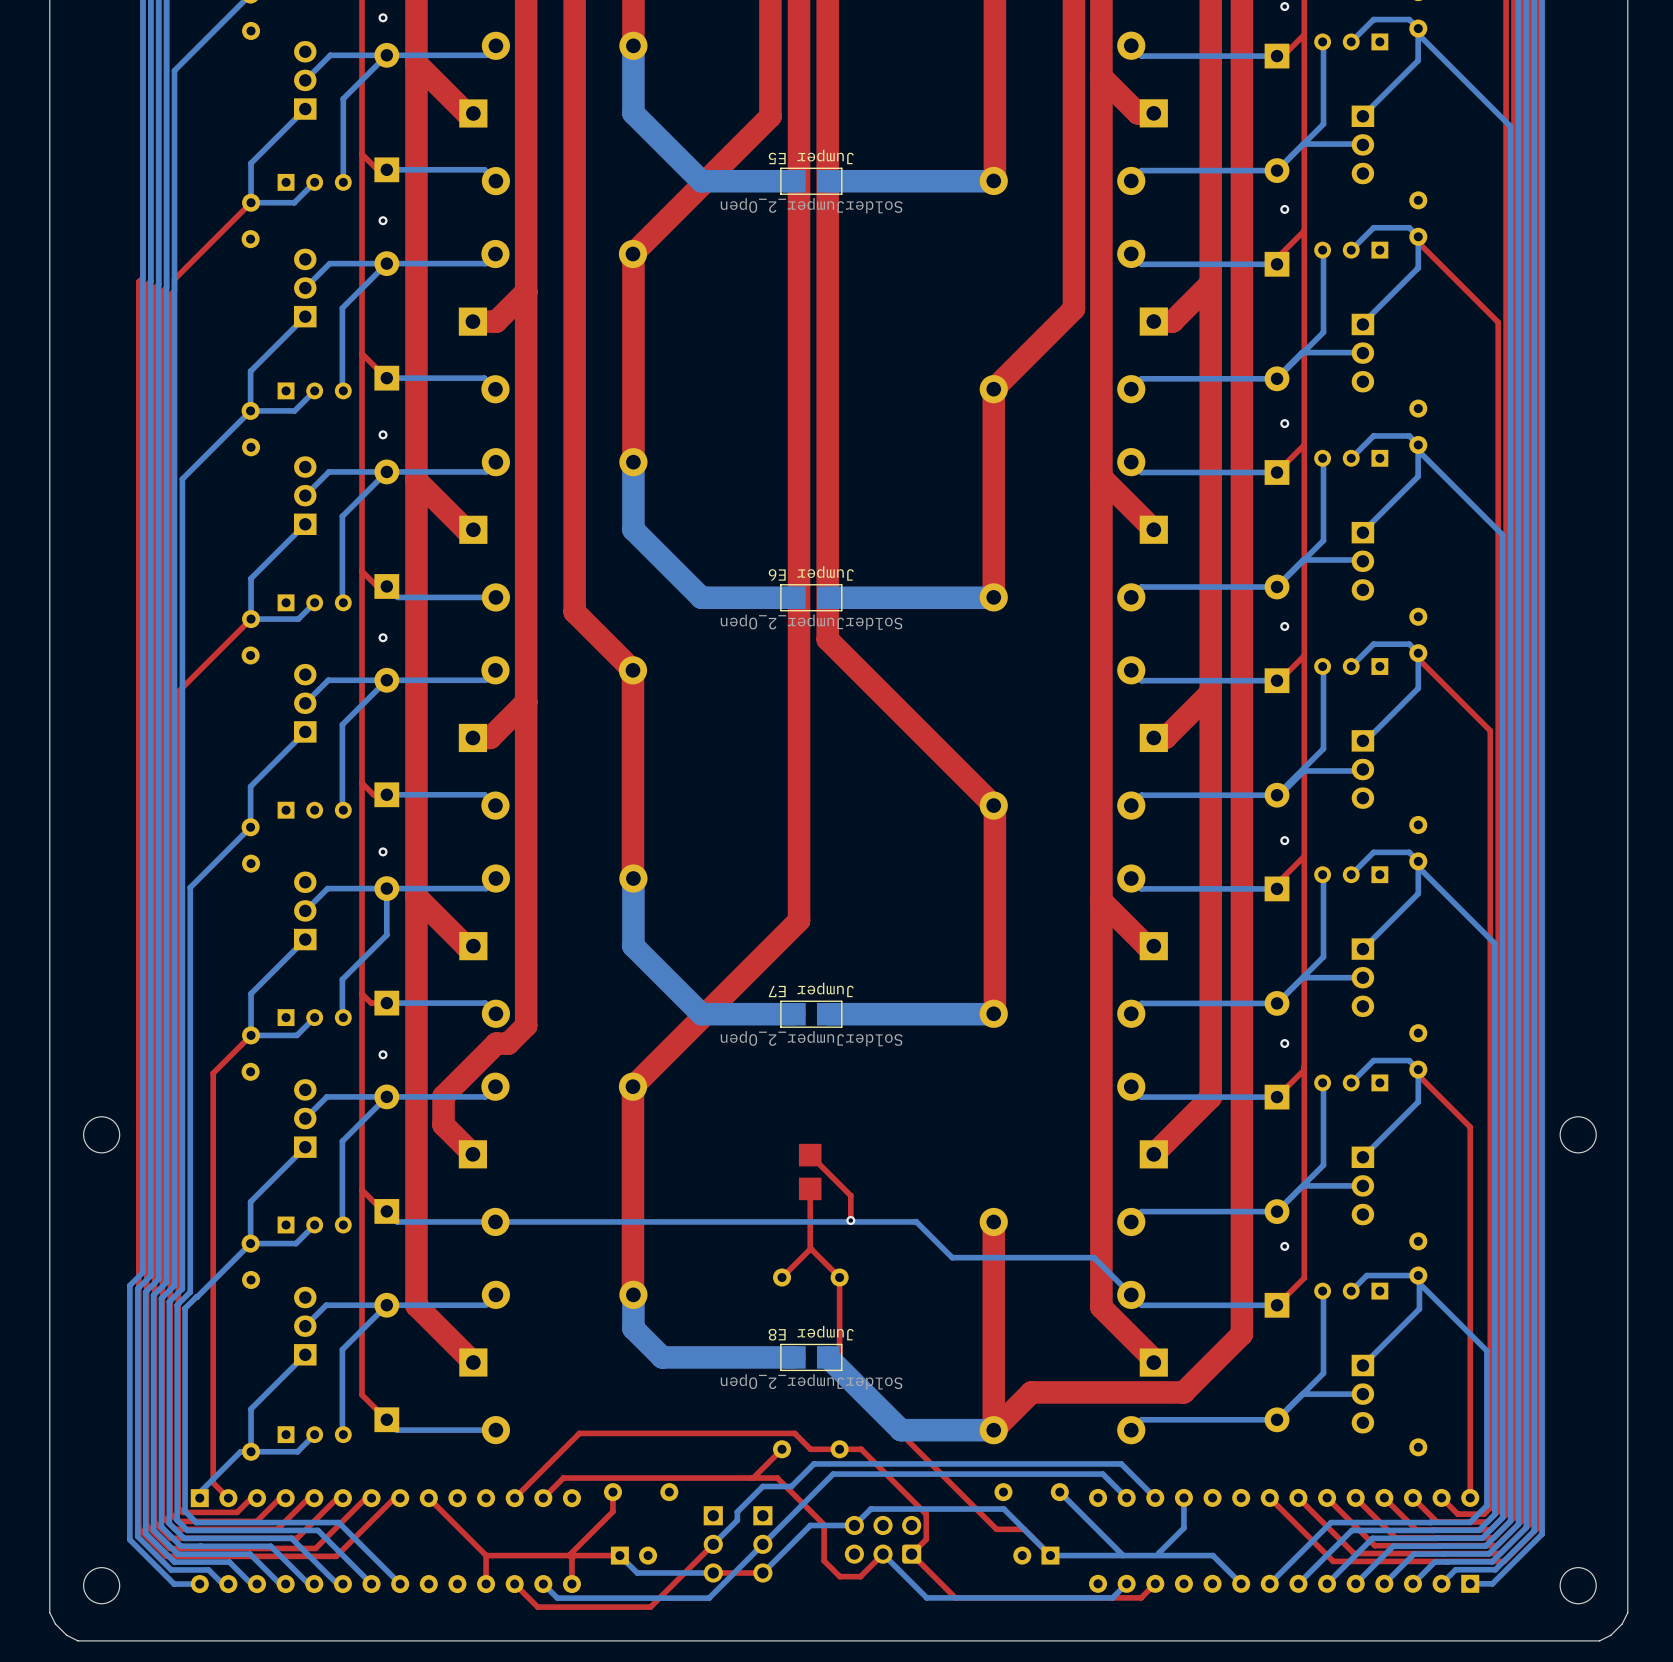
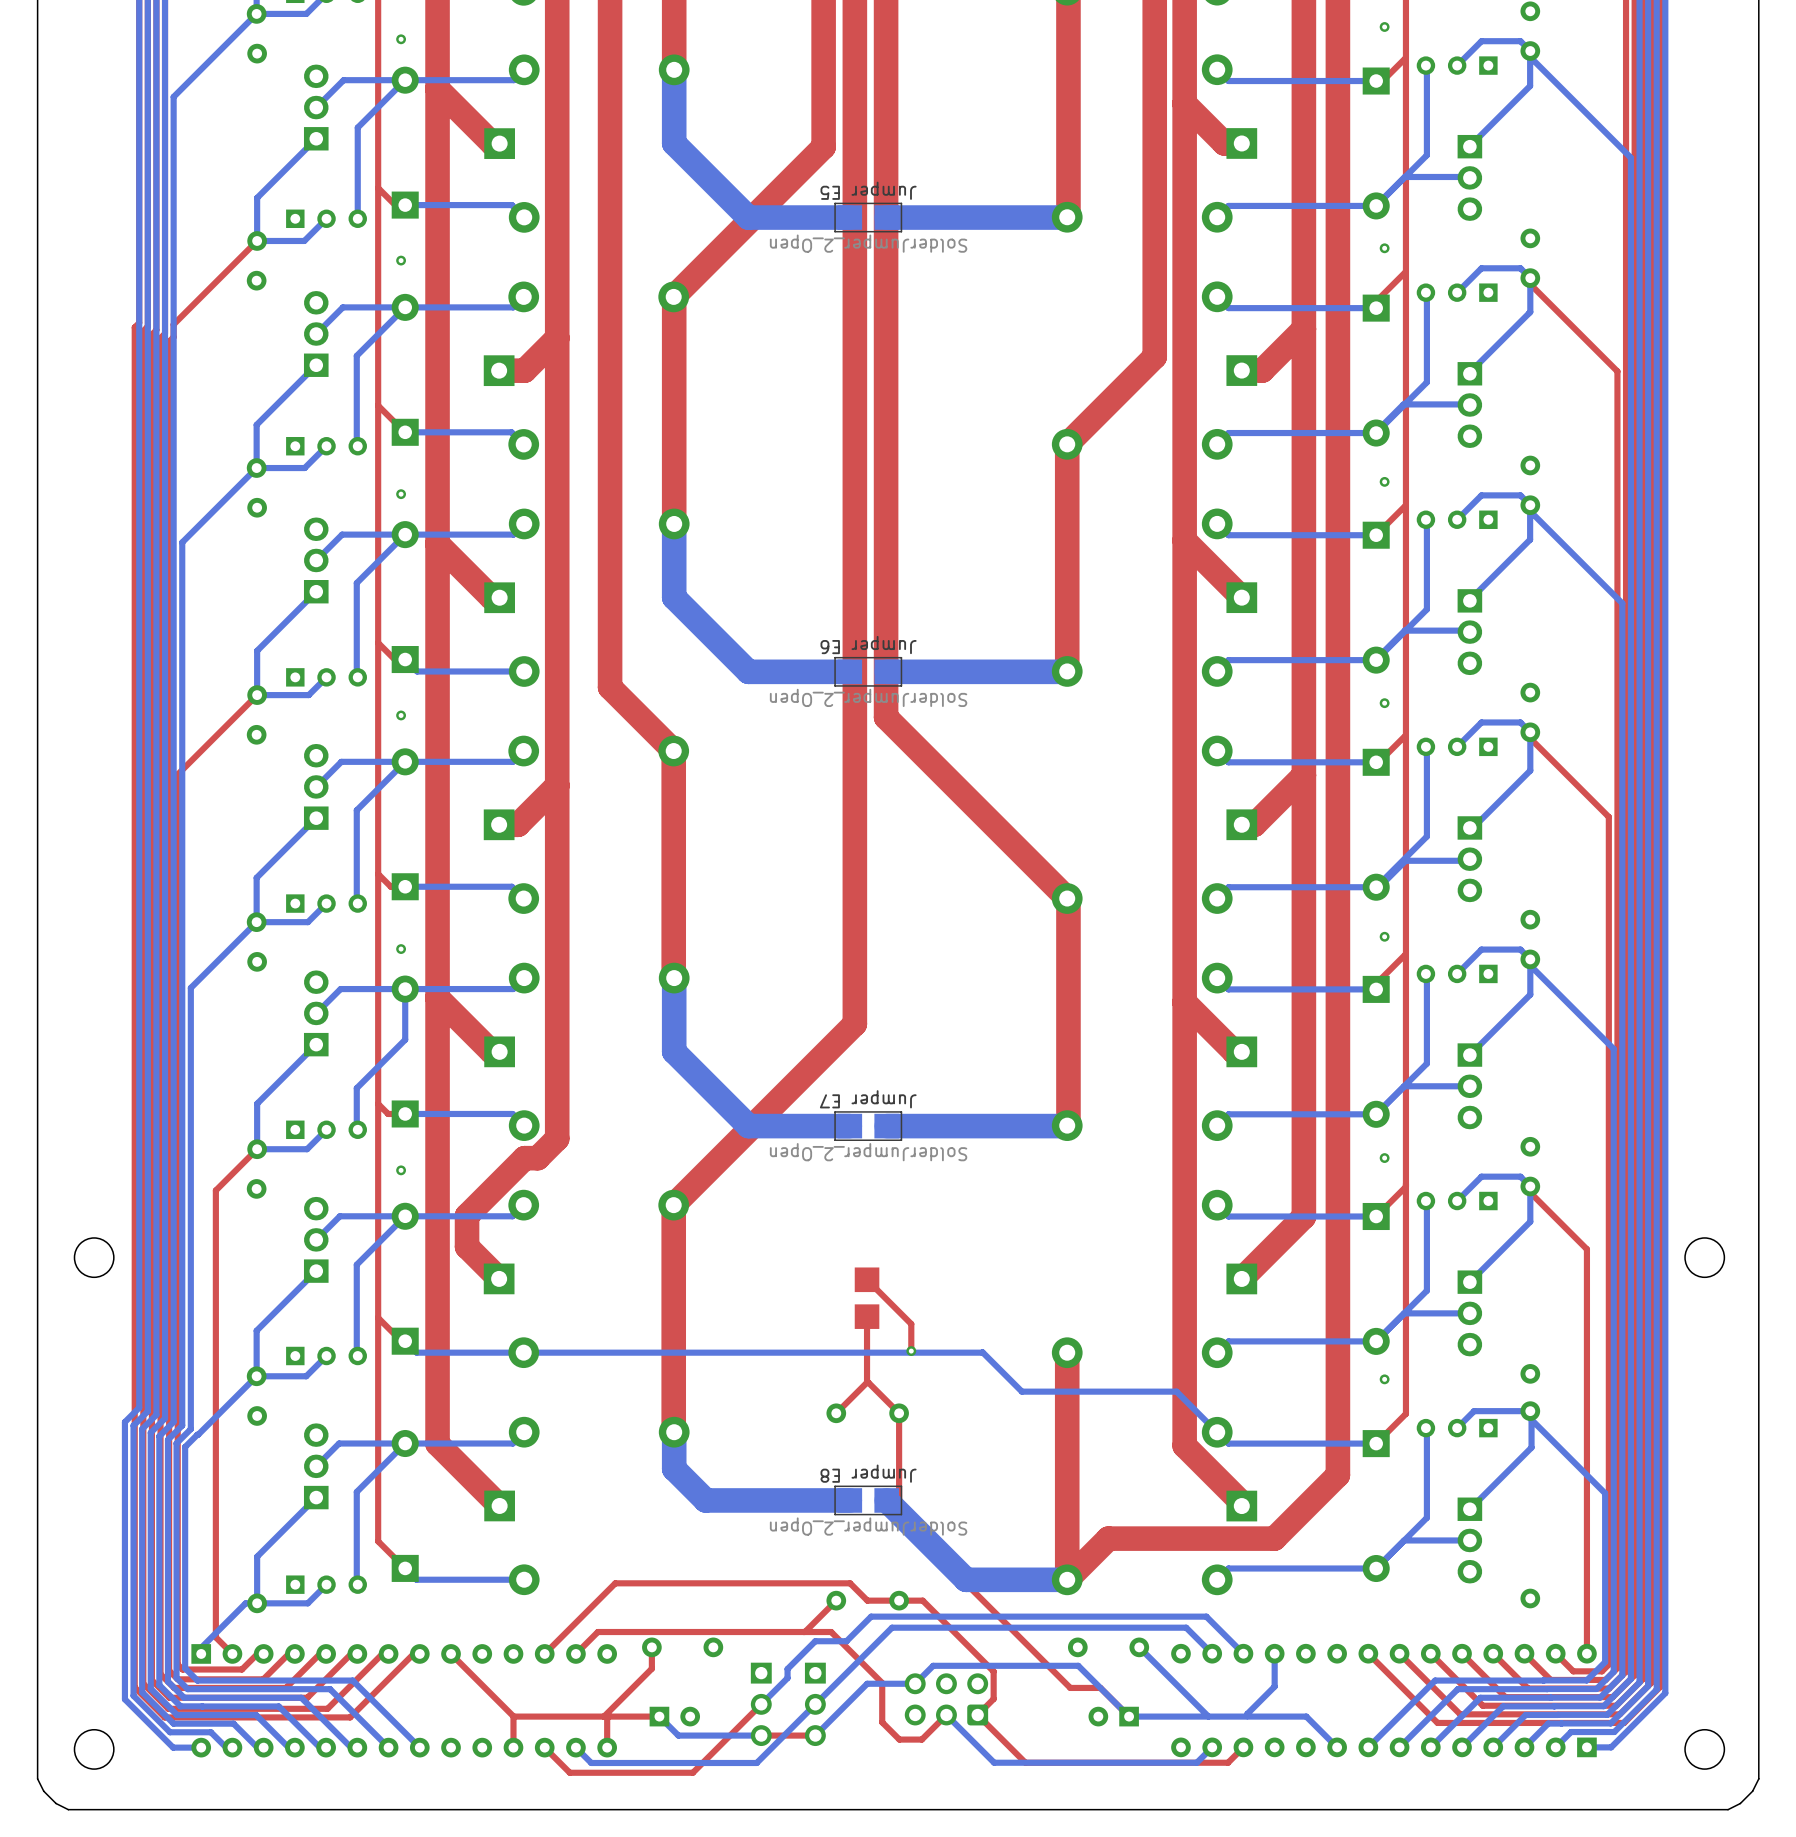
bottom track: none -> (326, 903) (307, 922) (256, 922)

